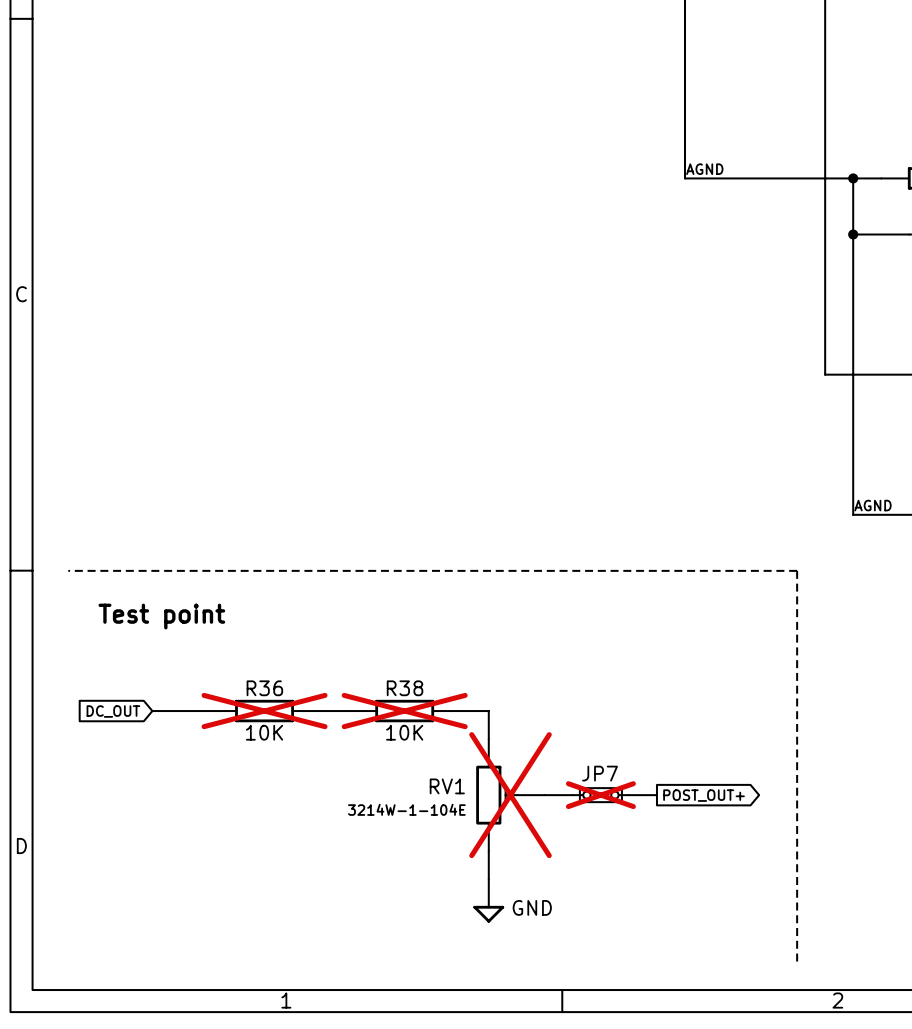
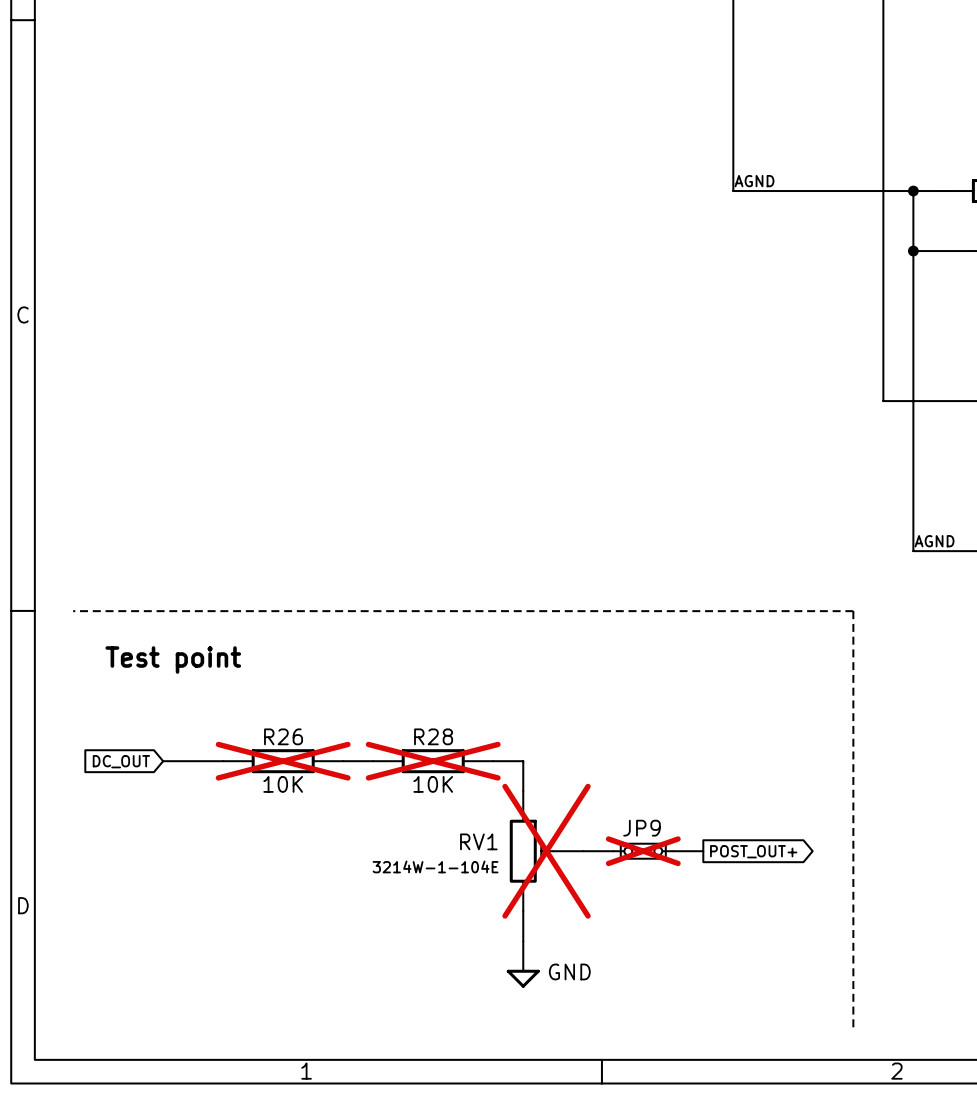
R36 name: R36 (264, 688) -> R26 (283, 736)
R38 name: R38 (405, 688) -> R28 (433, 736)
JP7 name: JP7 (600, 773) -> JP9 (641, 828)

